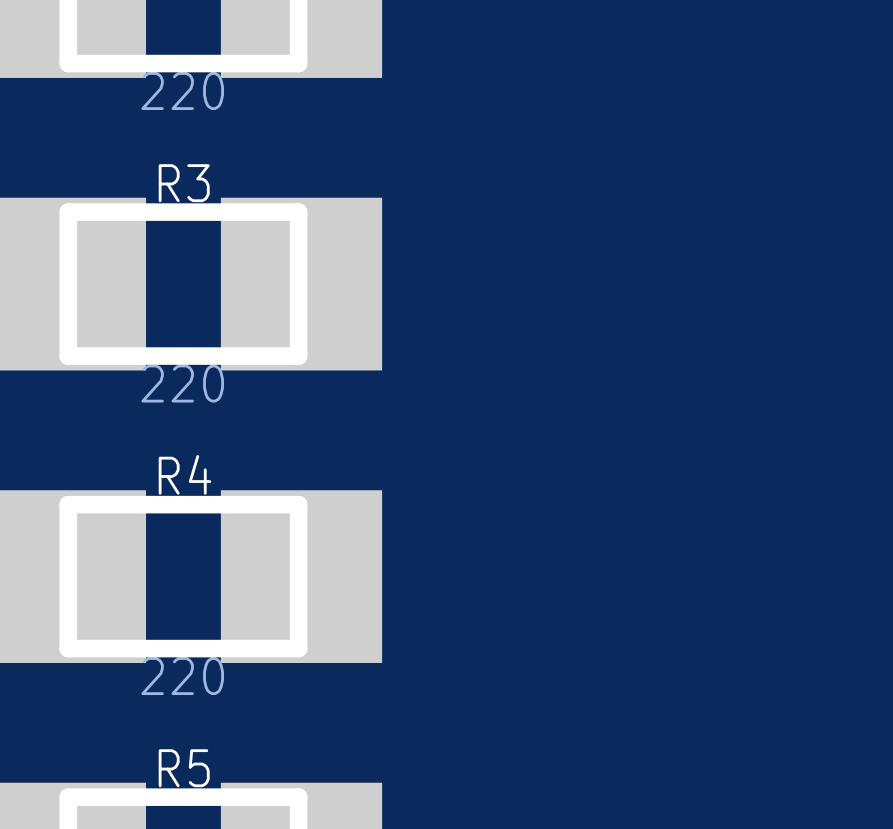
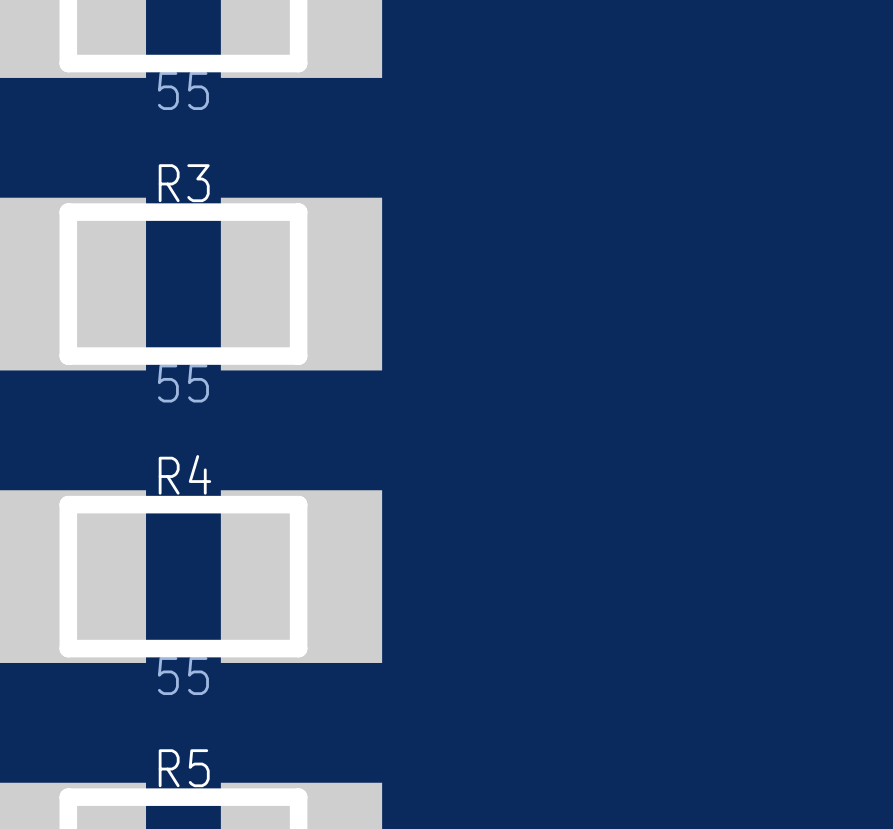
part value: 220 (182, 91) -> 55 (183, 91)
R3 value: 220 (182, 383) -> 55 (183, 383)
R4 value: 220 (182, 676) -> 55 (183, 676)

